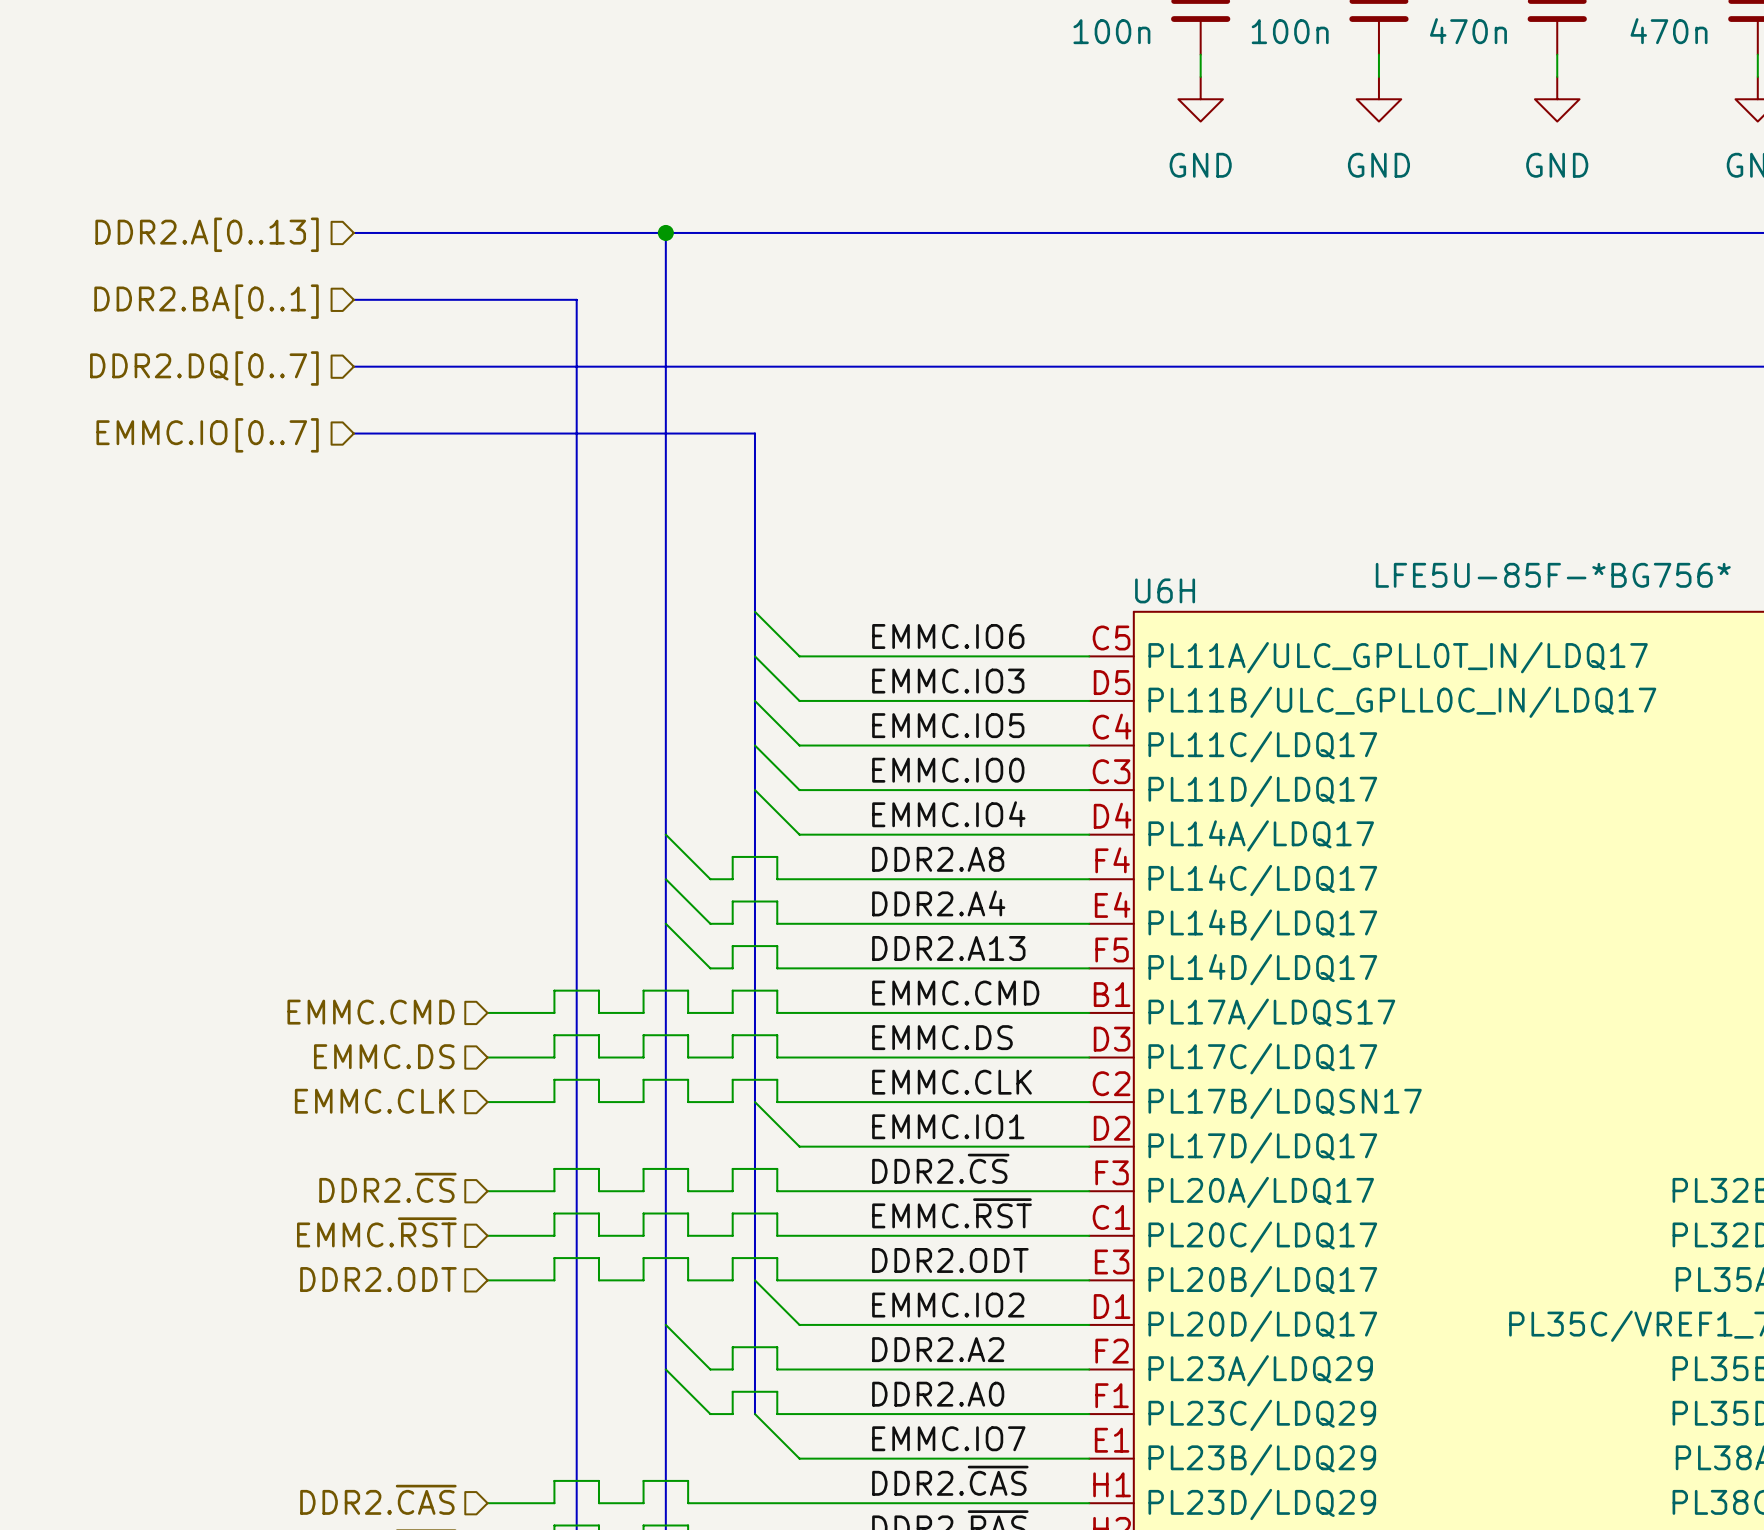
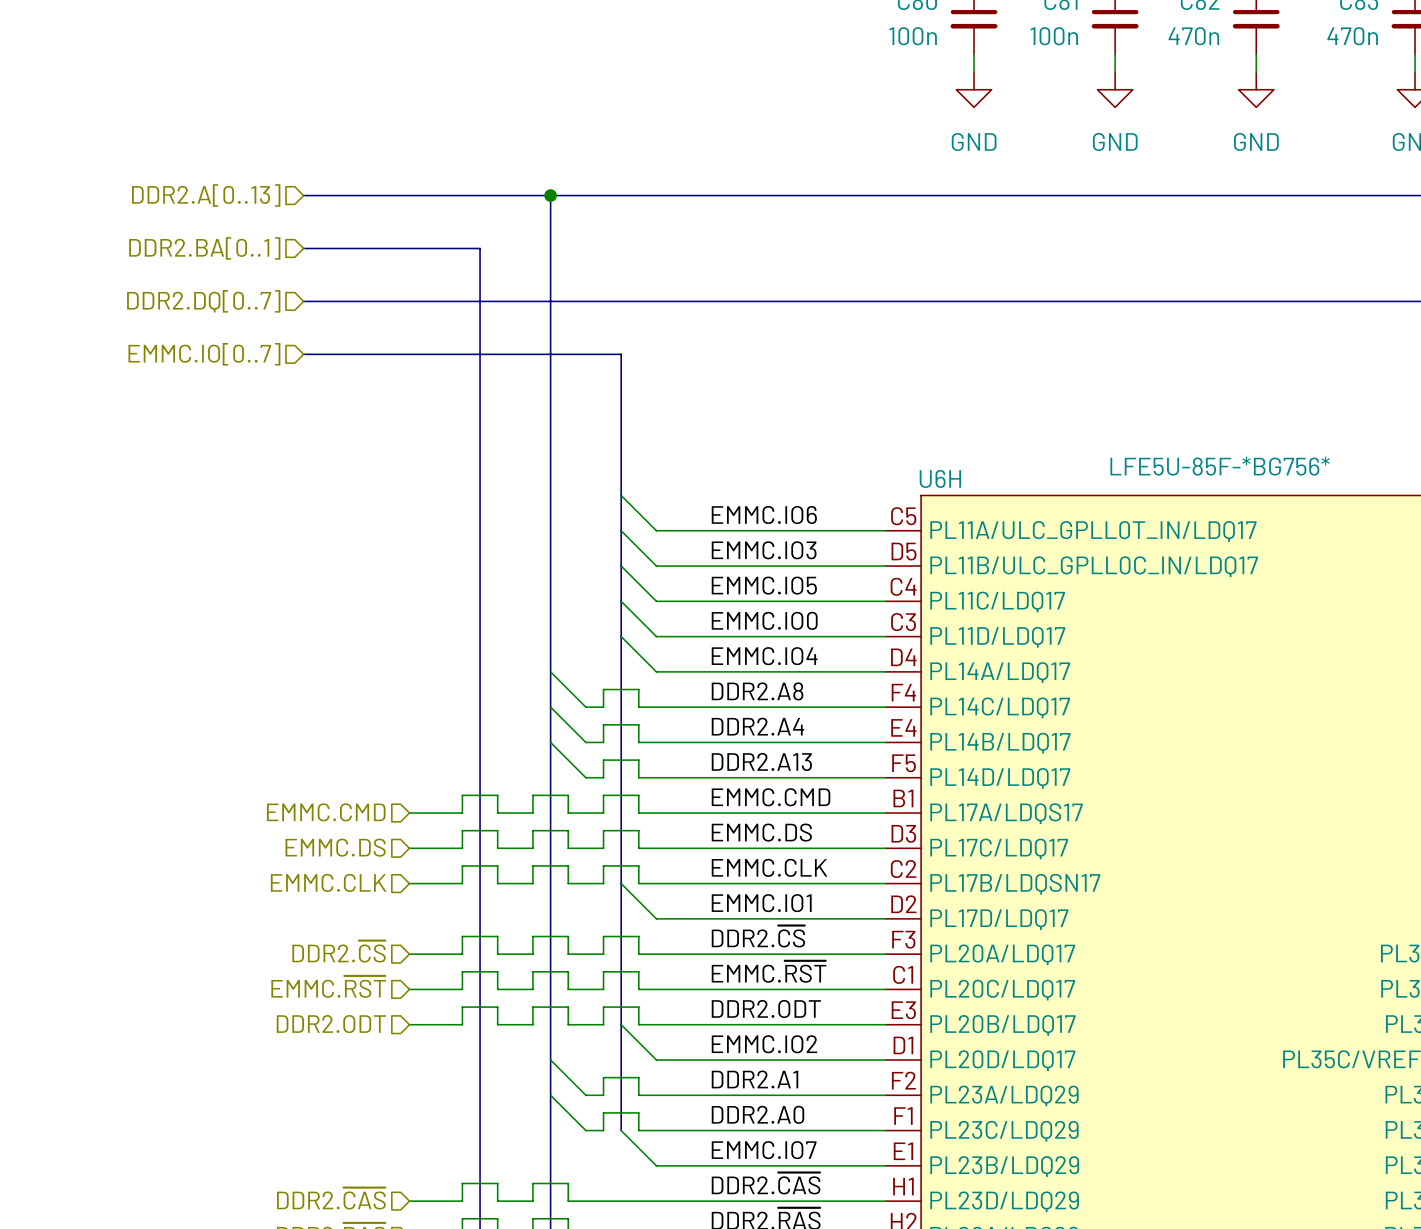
label: DDR2.A2 (938, 1349) -> DDR2.A1 (754, 1079)

